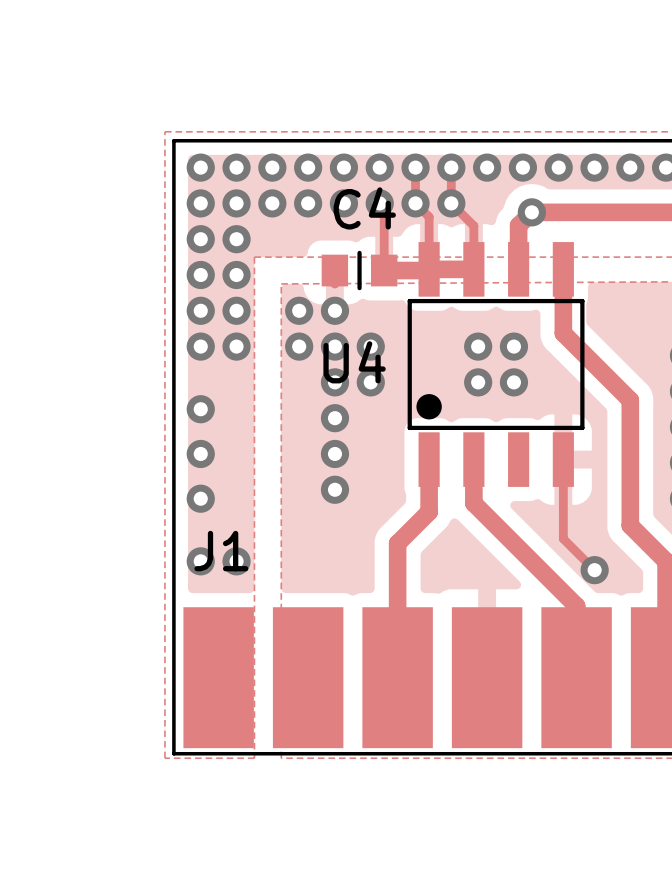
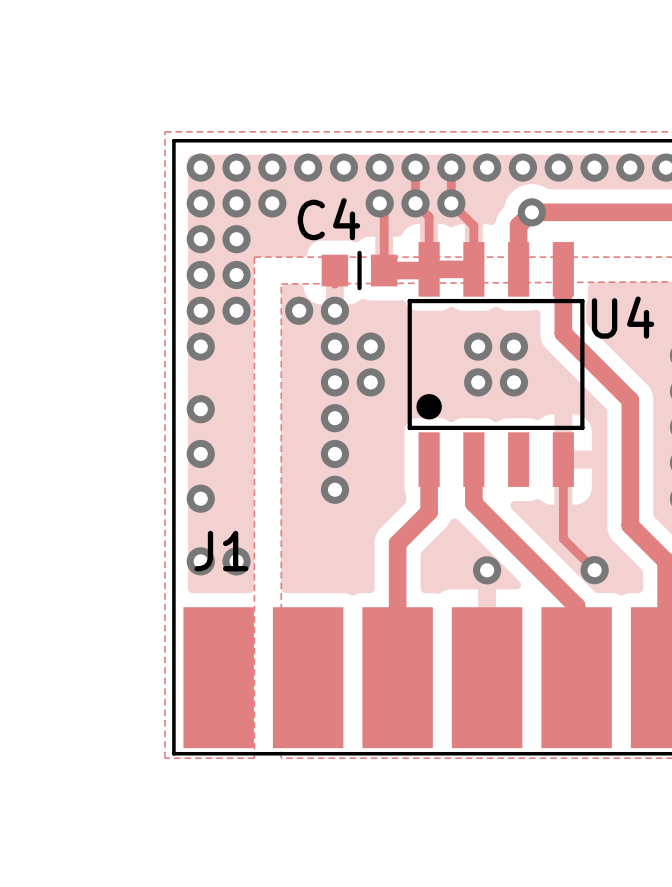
via: (308, 203) -> none
via: (343, 203) -> none
C4 name position: C4 (364, 208) -> C4 (328, 219)
via: (236, 346) -> none
via: (299, 346) -> none
U4 name position: U4 (354, 362) -> U4 (623, 317)
via: none -> (487, 570)

